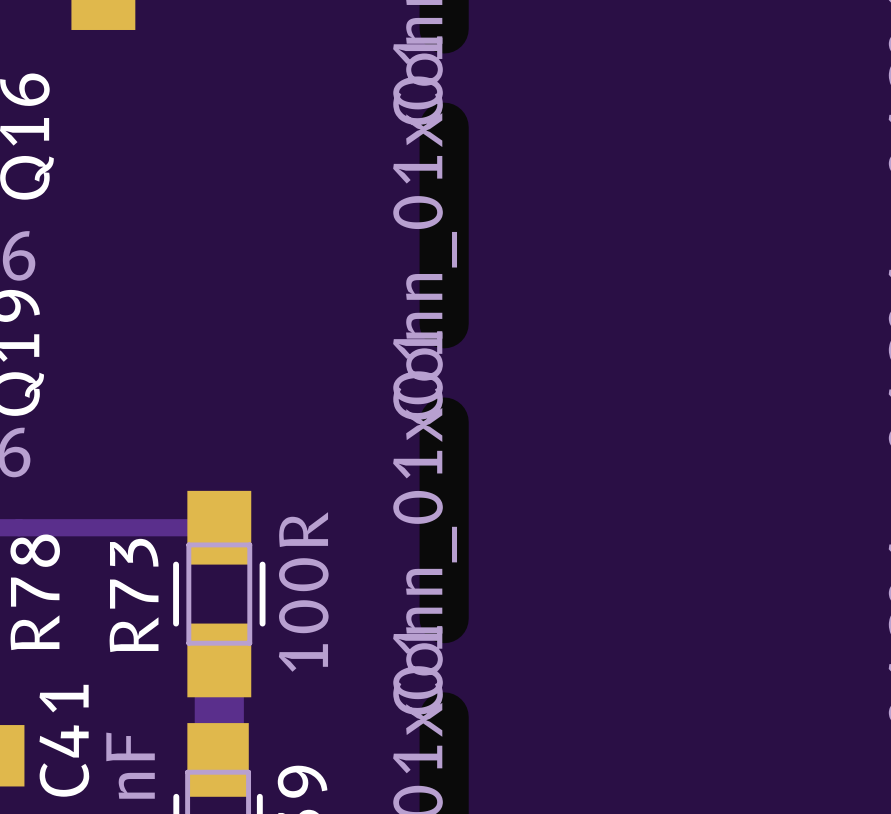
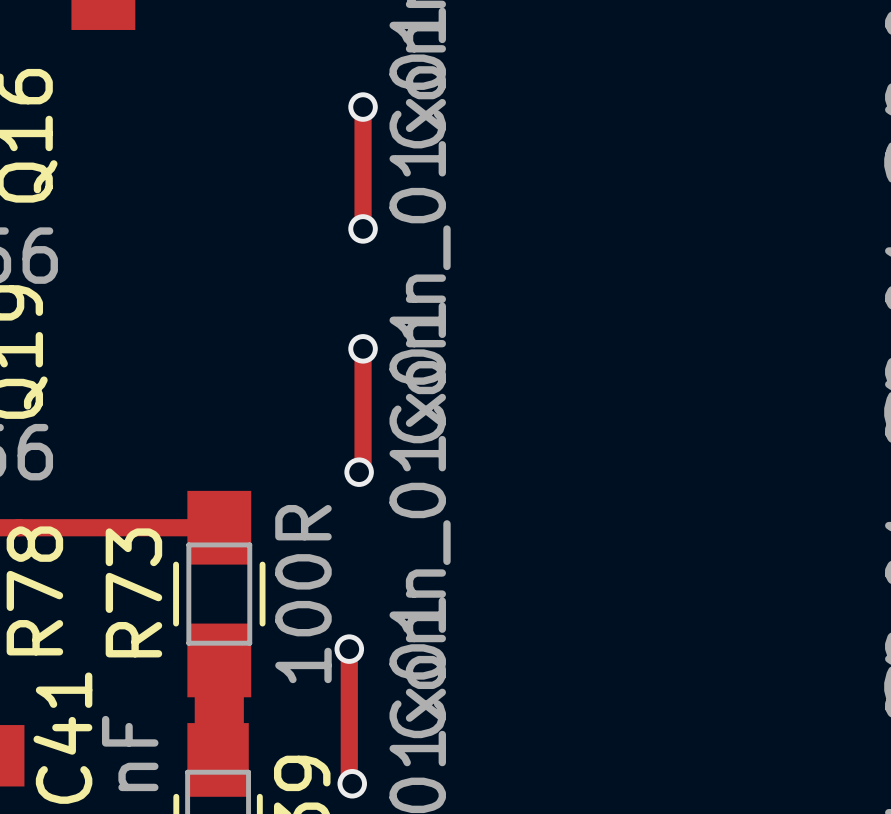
track: none -> (363, 107) (363, 228)
via: none -> (363, 107)
via: none -> (363, 228)
track: none -> (363, 348) (363, 468) (359, 472)
via: none -> (363, 348)
via: none -> (359, 472)
track: none -> (349, 649) (349, 780) (352, 783)
via: none -> (349, 649)
via: none -> (352, 783)

